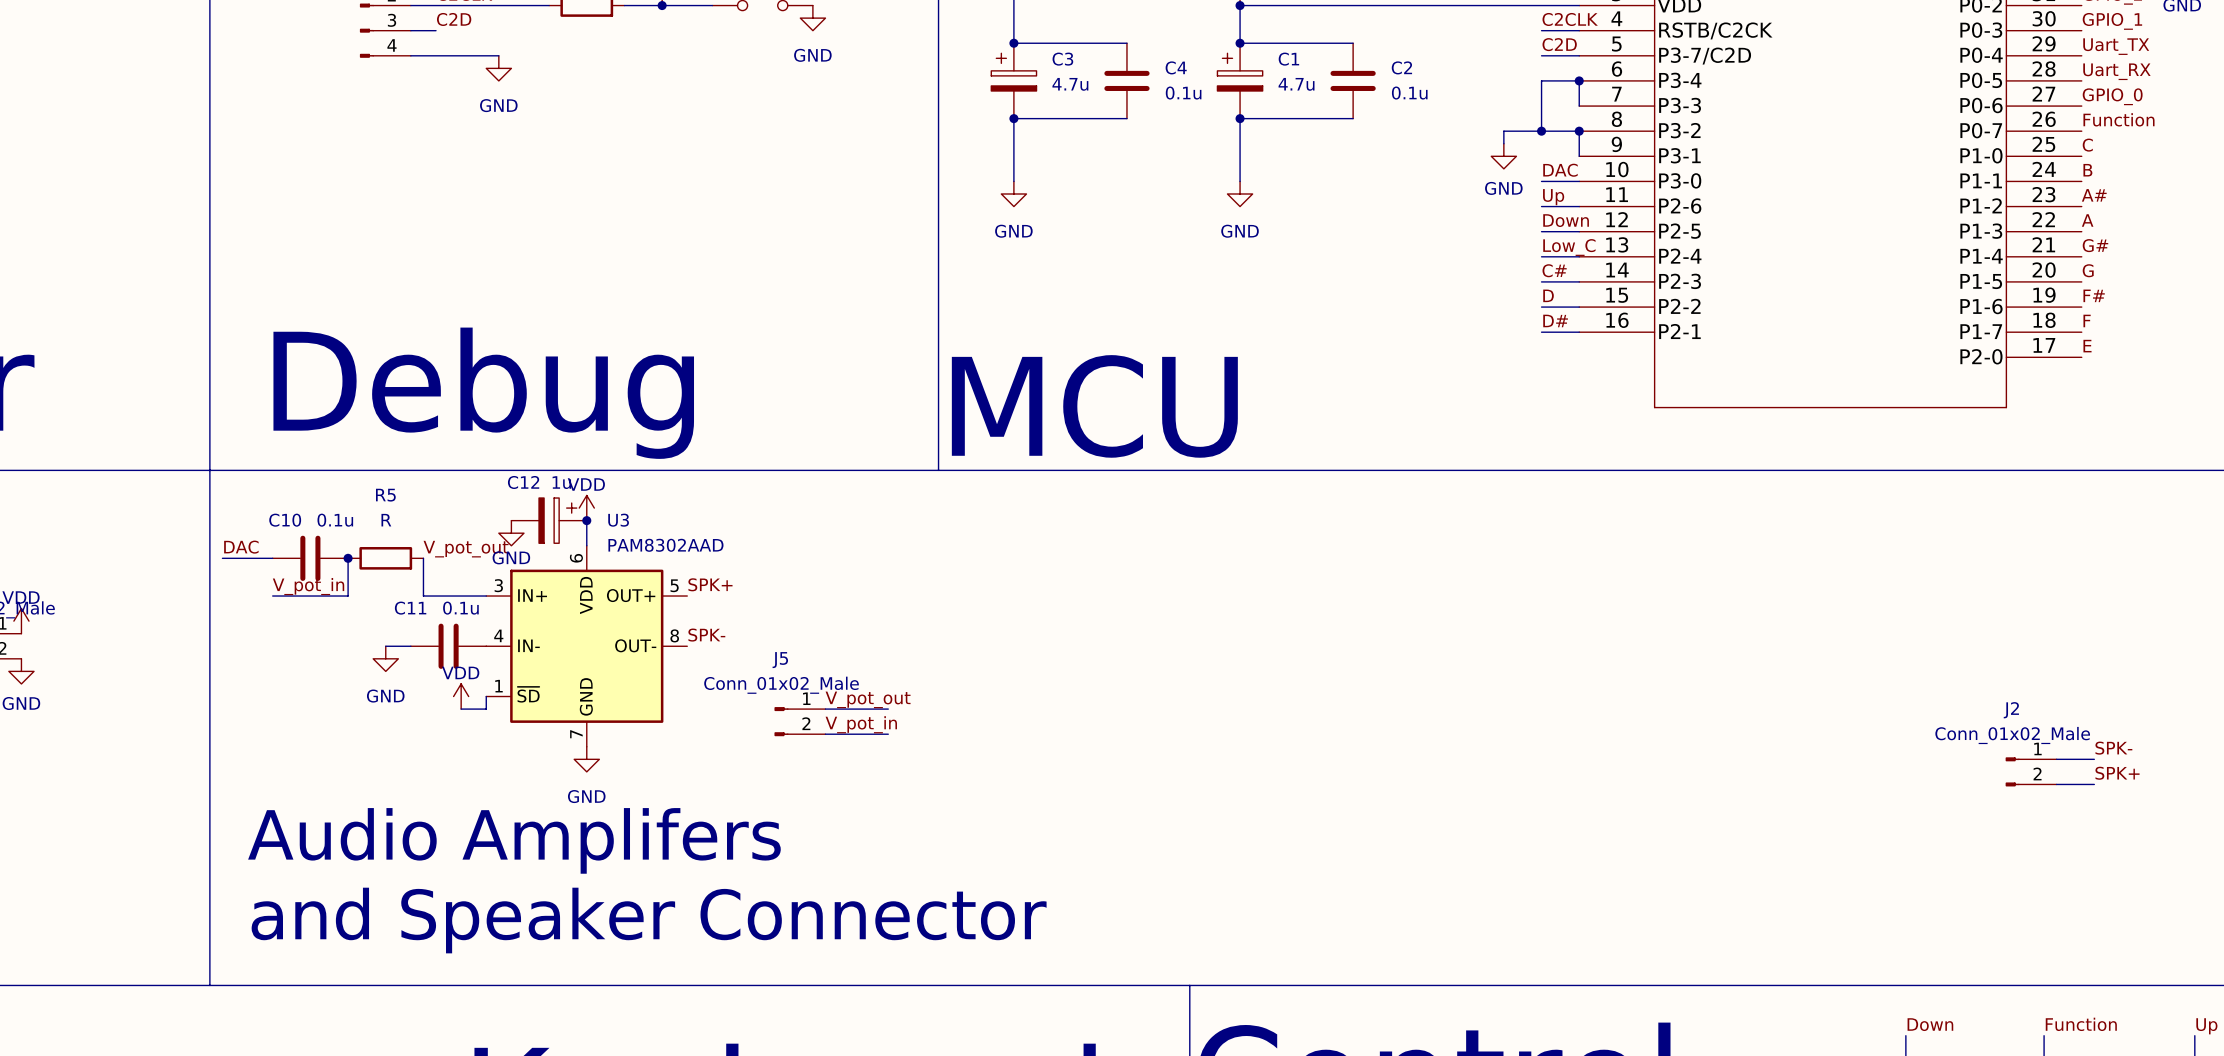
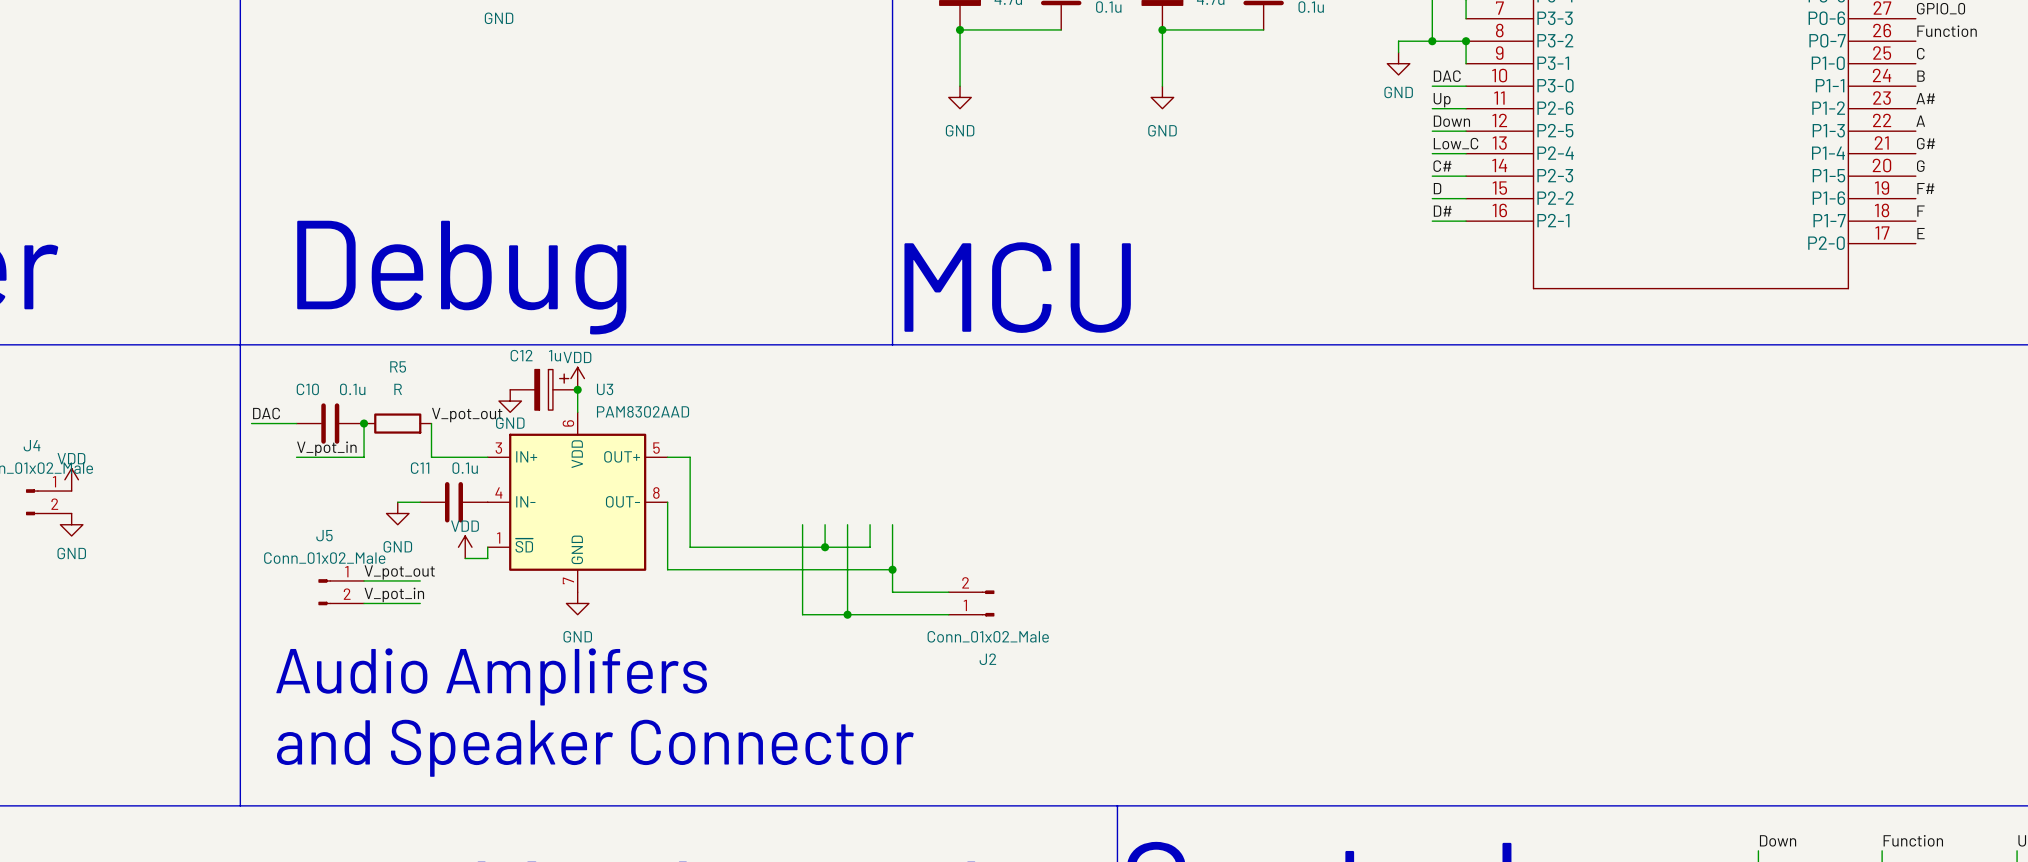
label: SPK+ (710, 584) -> none
wire: none -> (667, 457) (690, 457) (690, 547) (870, 547) (870, 524)
label: SPK- (706, 635) -> none
wire: none -> (667, 502) (667, 569) (892, 569)
wire: none -> (802, 524) (802, 614) (948, 614)
wire: none -> (825, 524) (825, 547)
wire: none -> (847, 524) (847, 614)
wire: none -> (892, 524) (892, 592) (948, 592)
junction: none -> (825, 547)
label: V_pot_out (868, 699) -> none
wire: (825, 709) (888, 709) -> none
J5 position: (799, 721) -> (341, 592)
junction: none -> (892, 569)
label: V_pot_in (861, 724) -> none
label: none -> V_pot_out (399, 572)
wire: none -> (364, 580) (420, 580)
wire: (825, 734) (888, 734) -> none
label: SPK- (2113, 748) -> none
label: none -> V_pot_in (394, 594)
wire: none -> (364, 603) (420, 603)
wire: (2056, 759) (2094, 759) -> none
junction: none -> (847, 614)
J2 rotation: 0° (2012, 771) -> 180° (988, 603)
J2 position: (2031, 771) -> (971, 603)
label: SPK+ (2117, 773) -> none
wire: (2056, 784) (2094, 784) -> none

